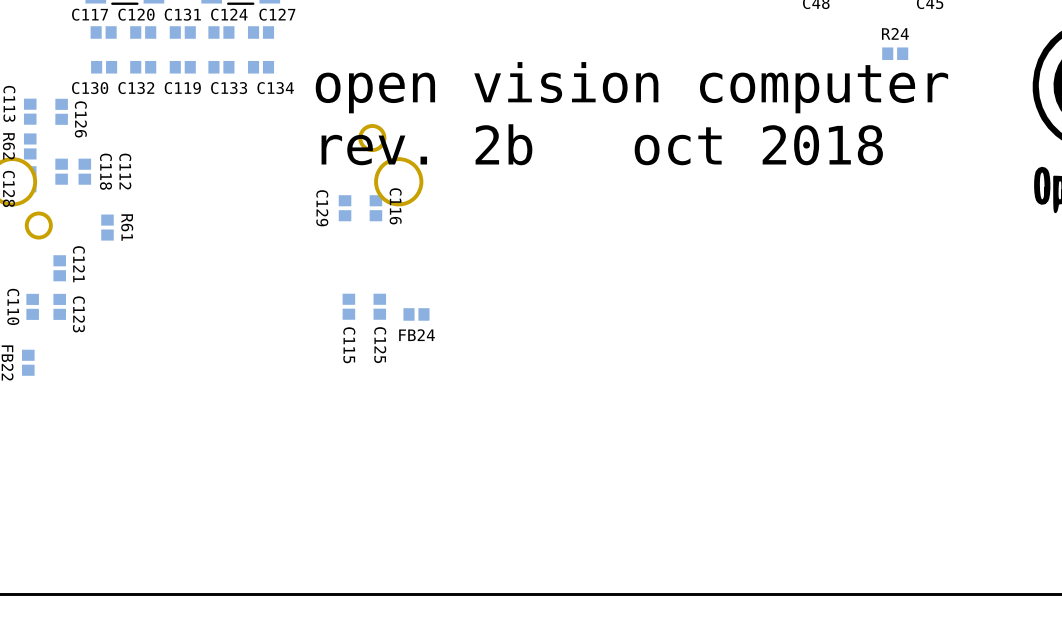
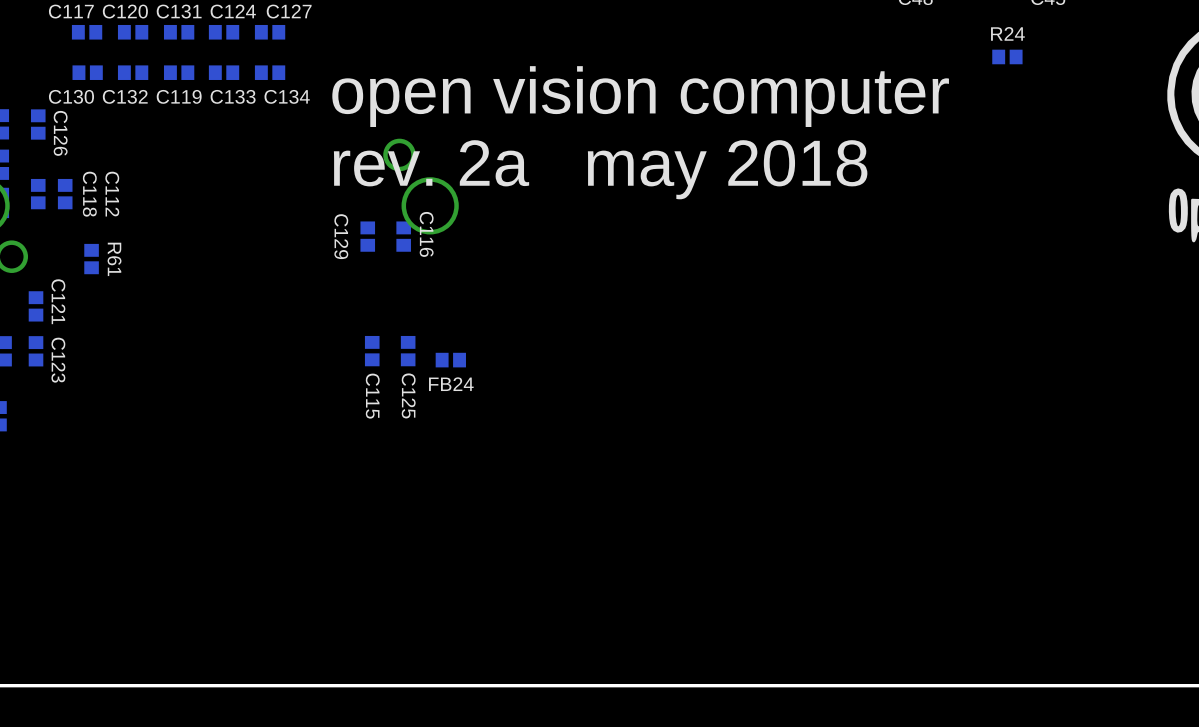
text: rev. 2b oct 2018 (602, 144) -> rev. 2a may 2018 (600, 169)

